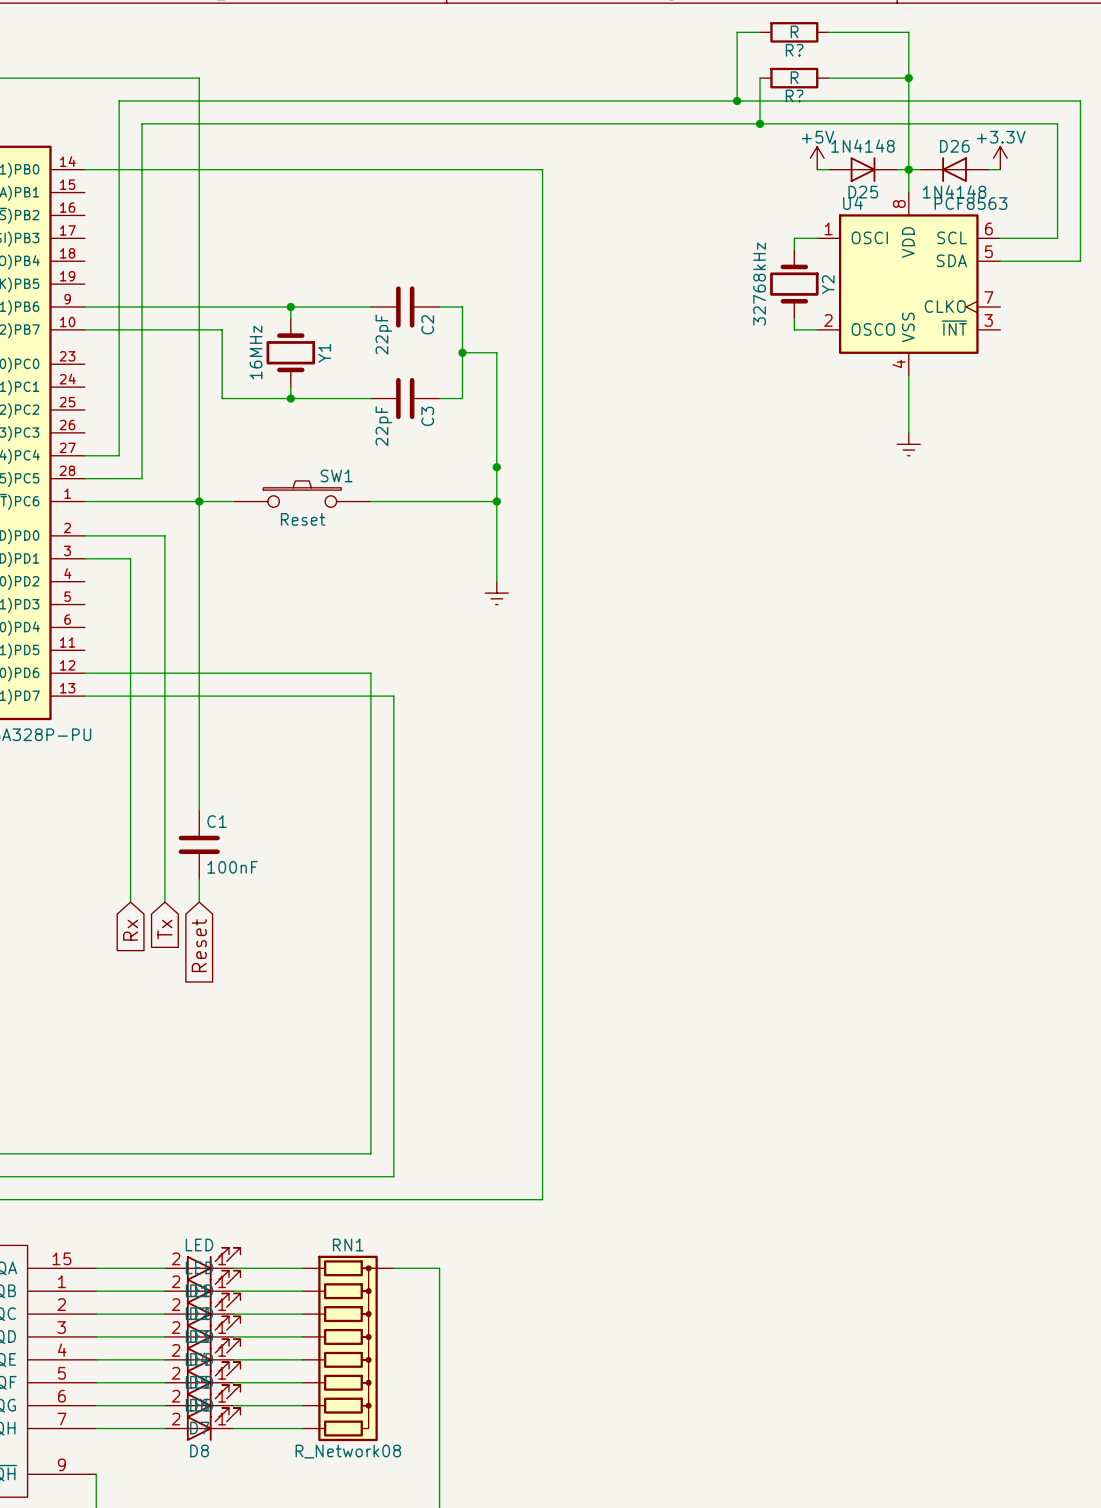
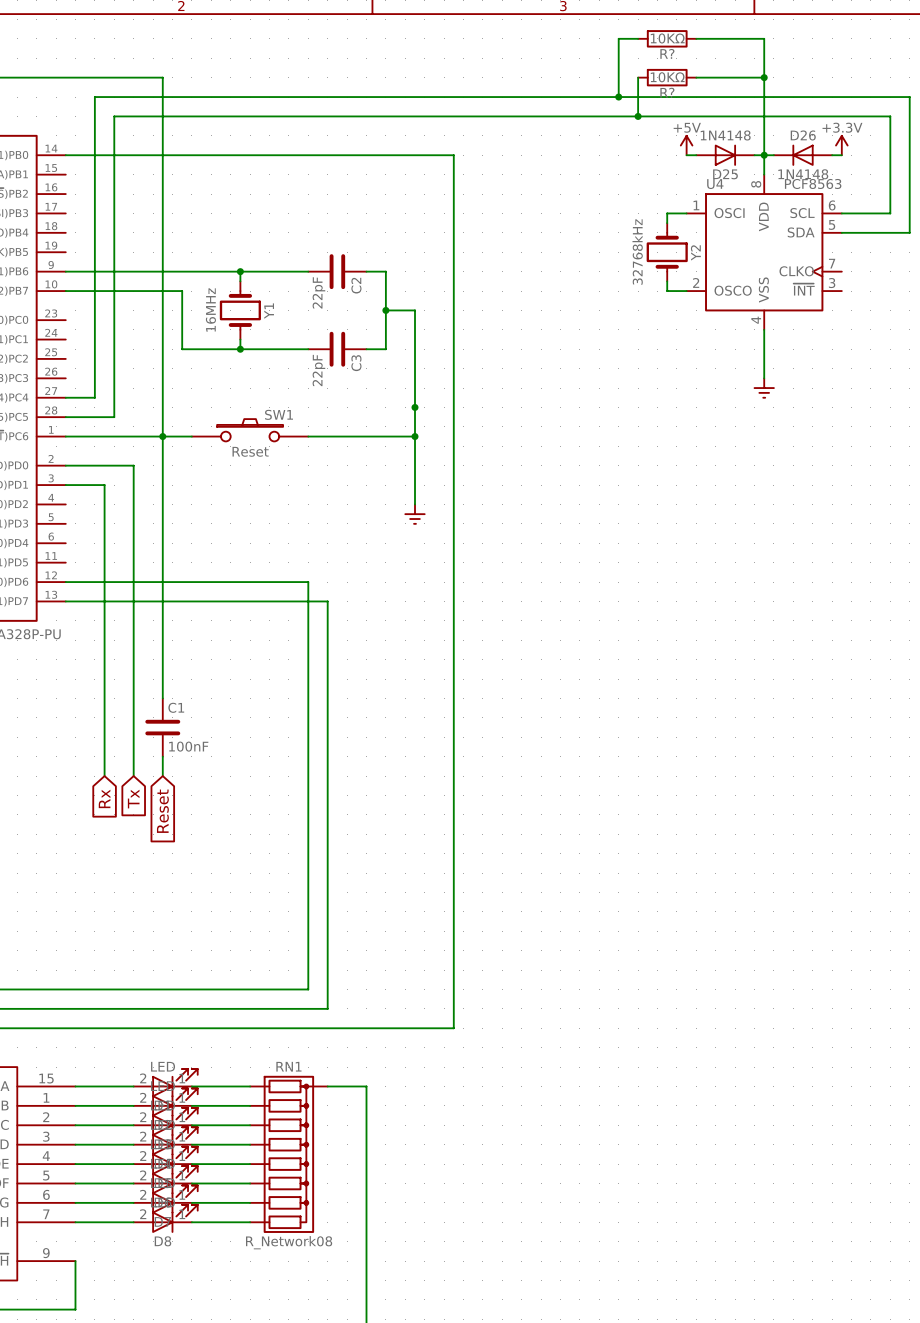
R? value: R (794, 31) -> 10KΩ (667, 38)
R? value: R (794, 77) -> 10KΩ (667, 77)

